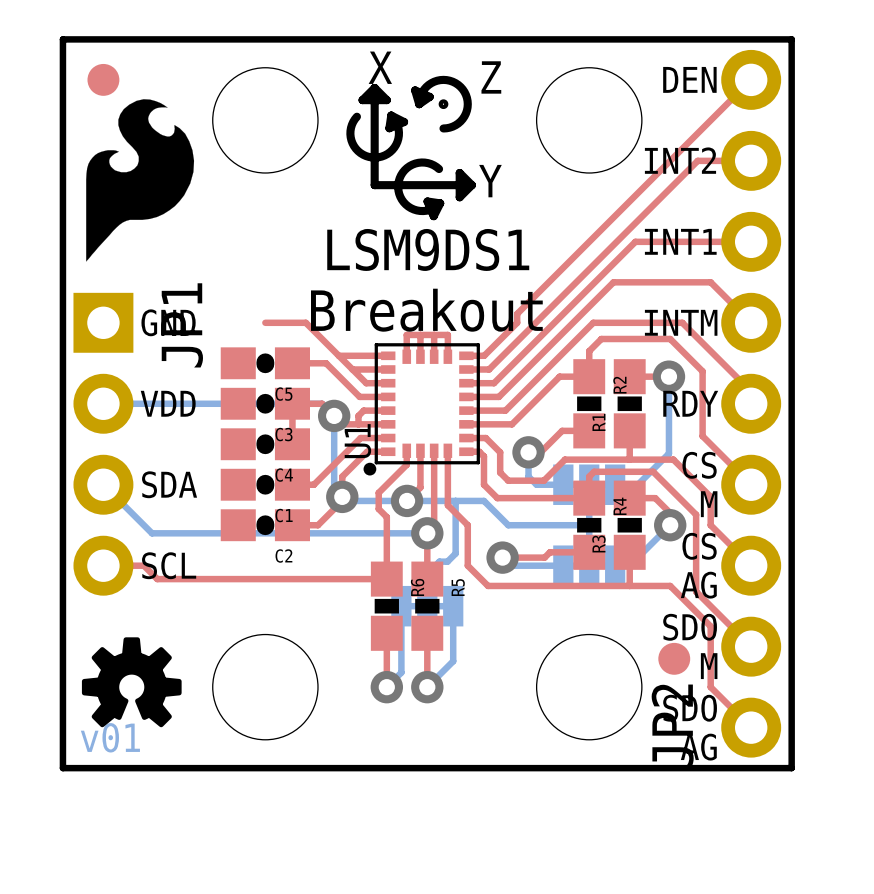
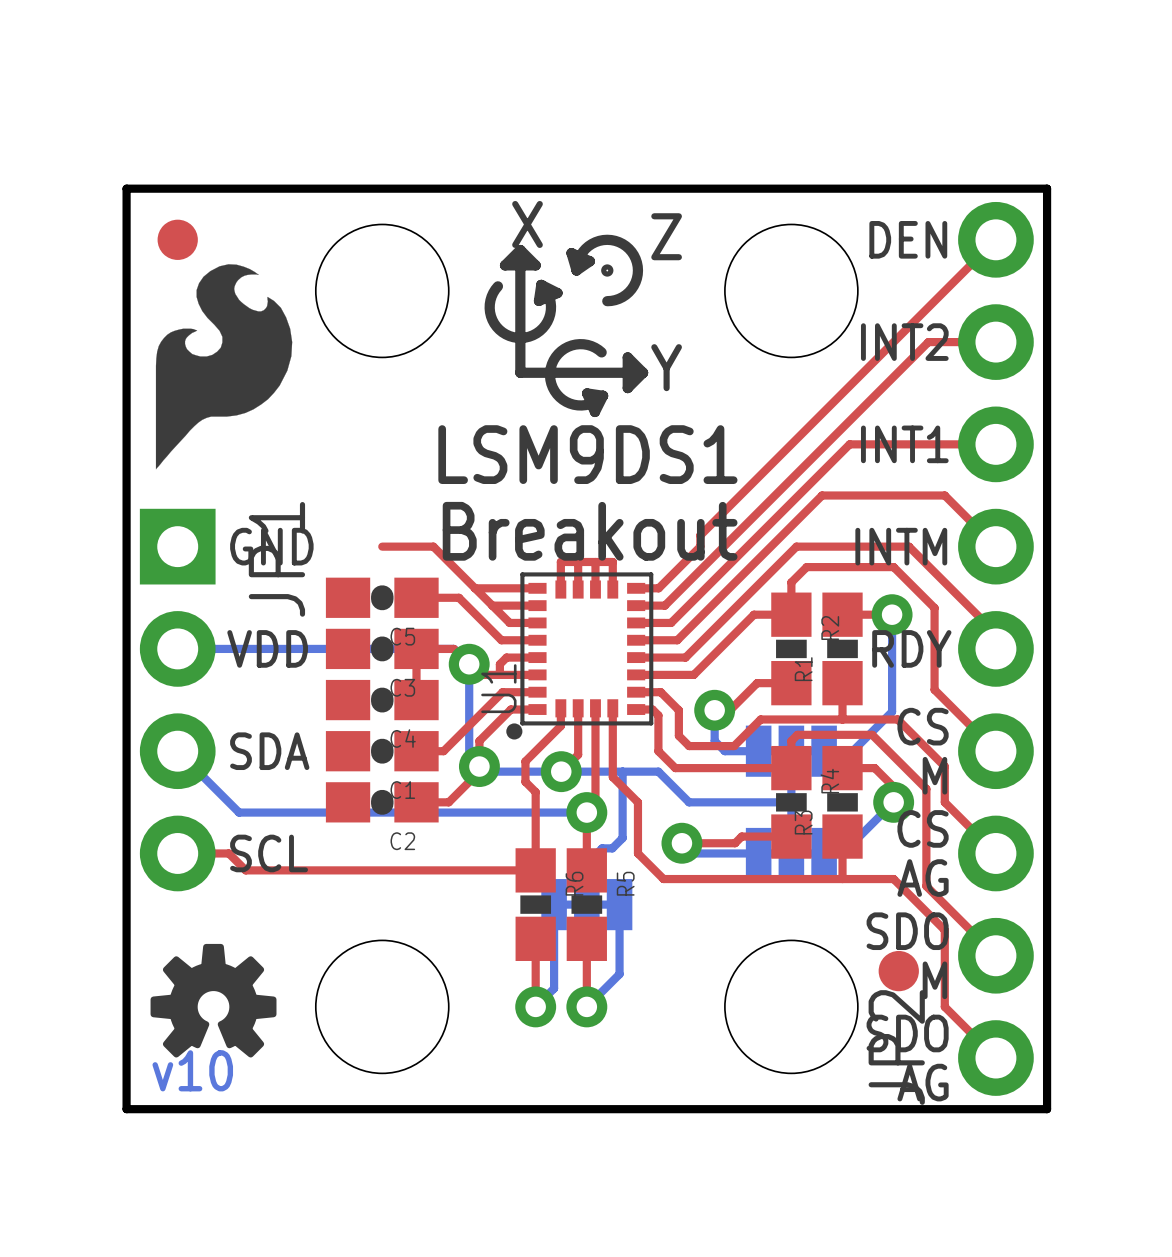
drawing shape: [80, 723, 140, 753] -> [152, 1050, 234, 1092]

